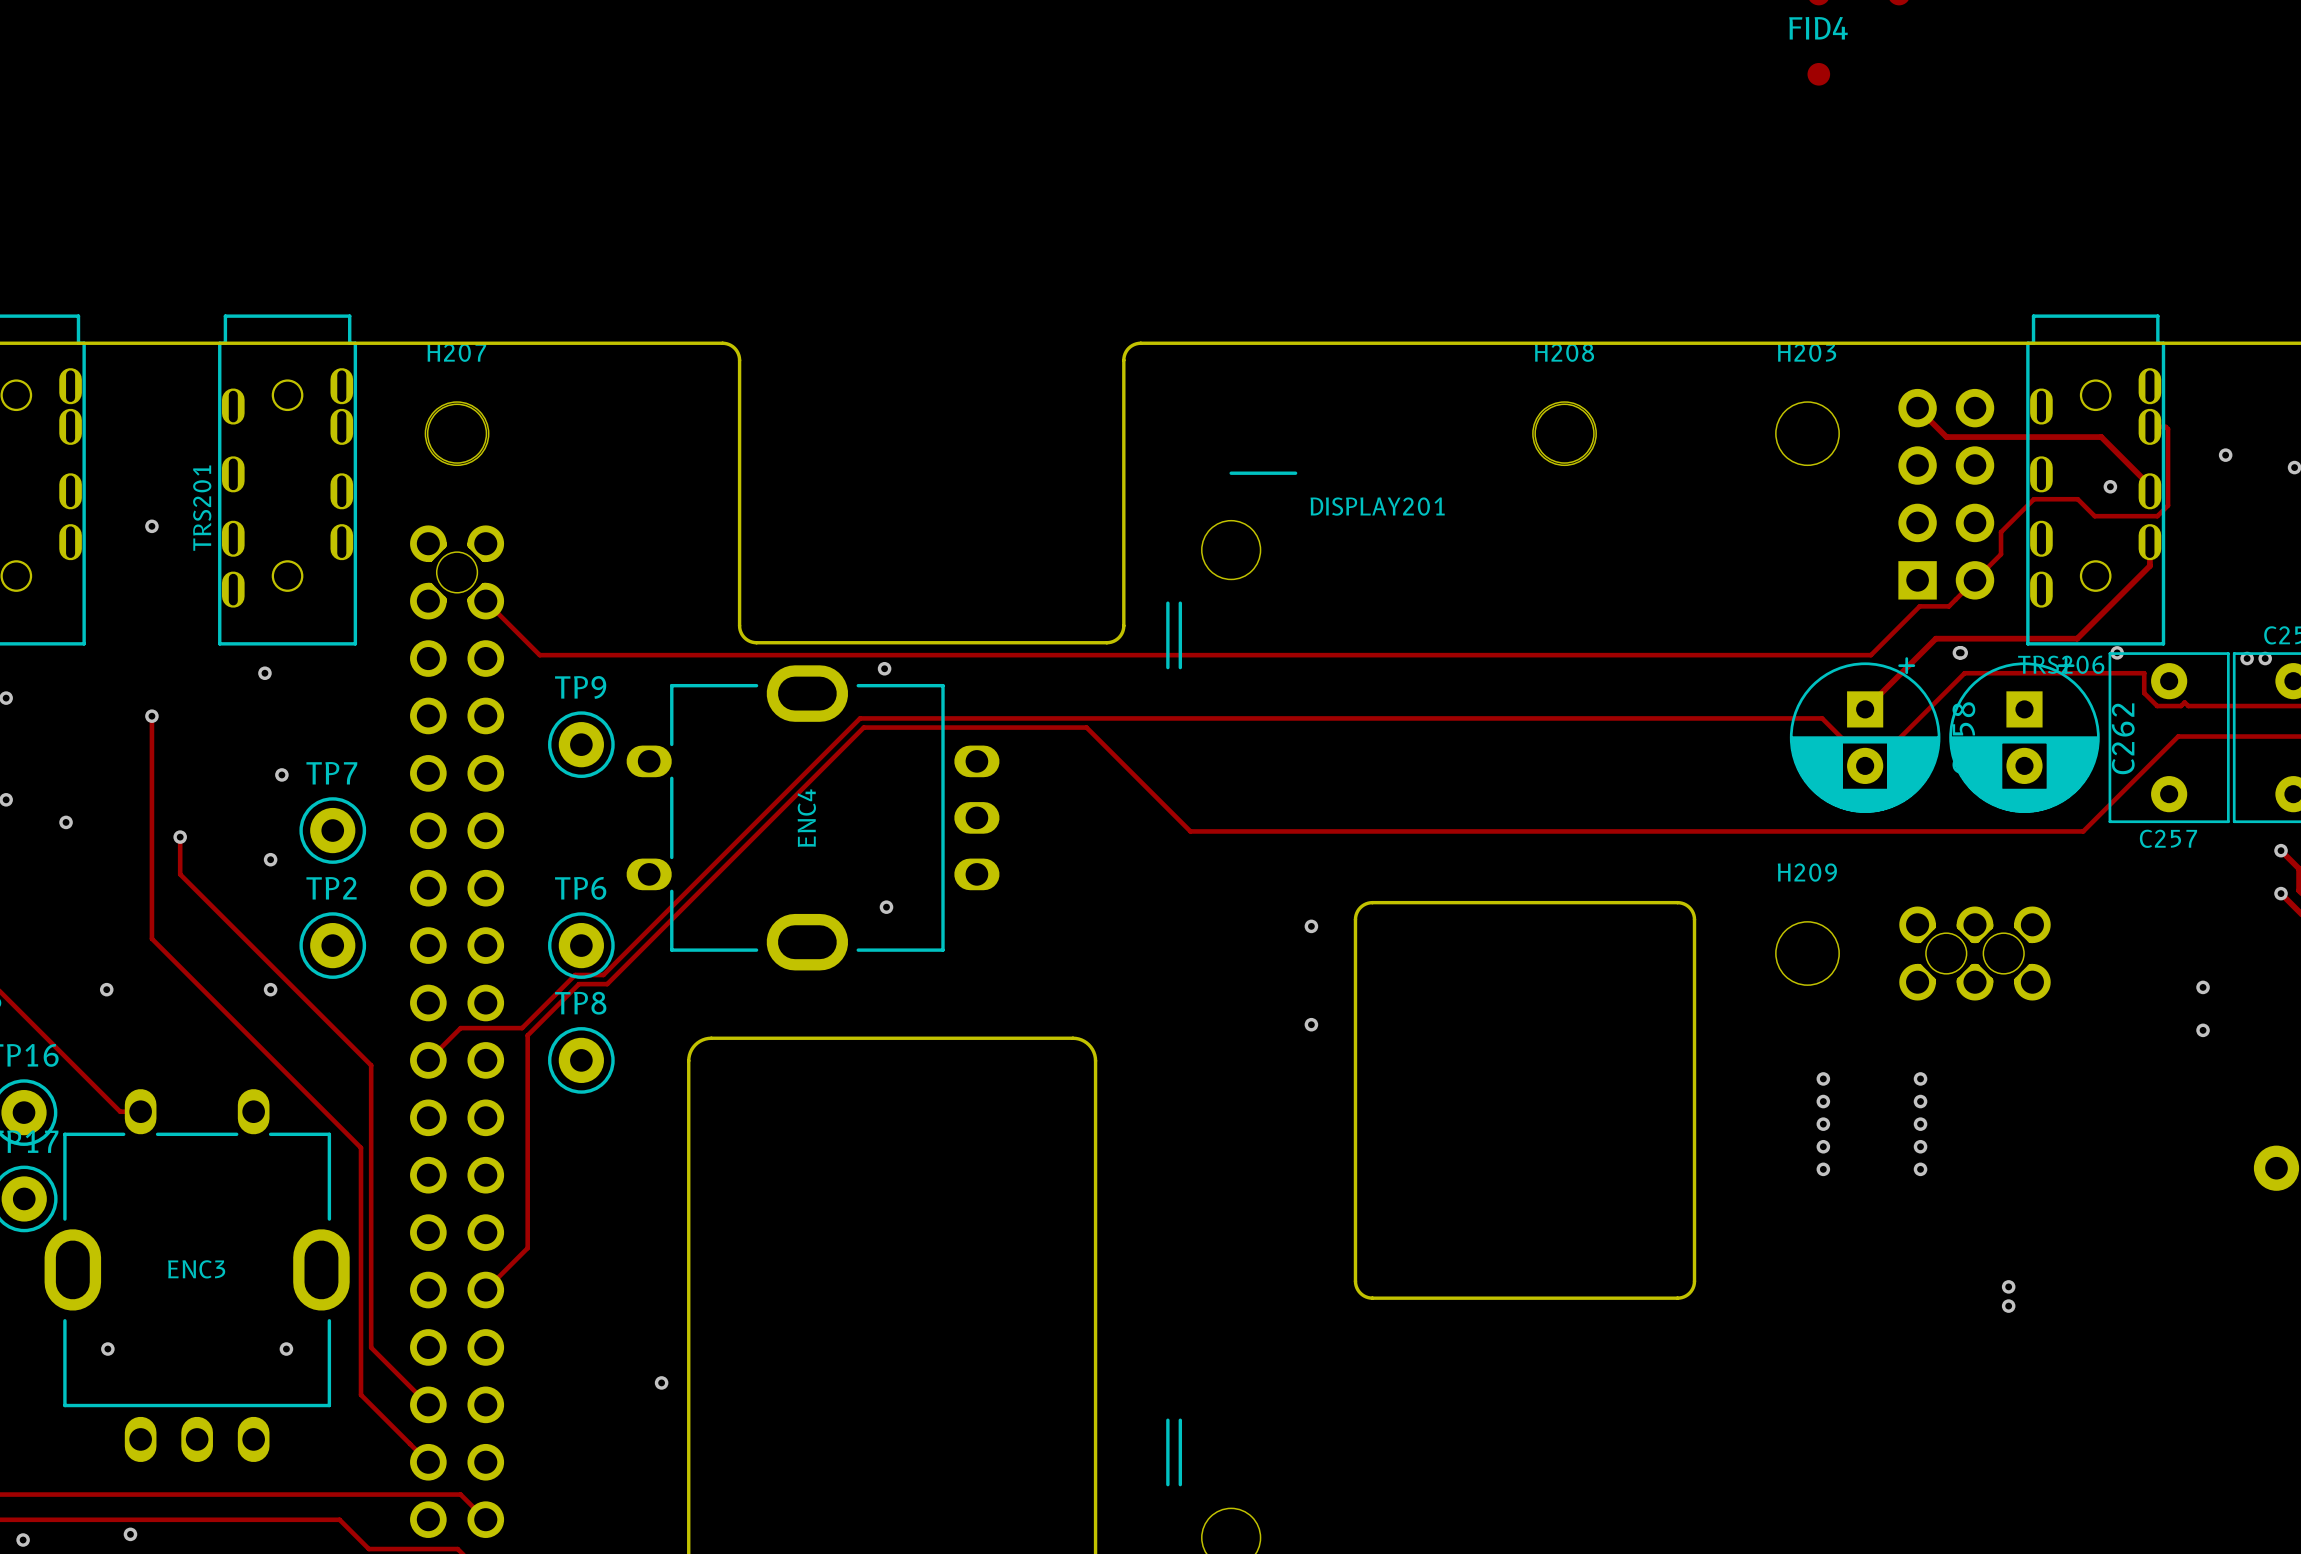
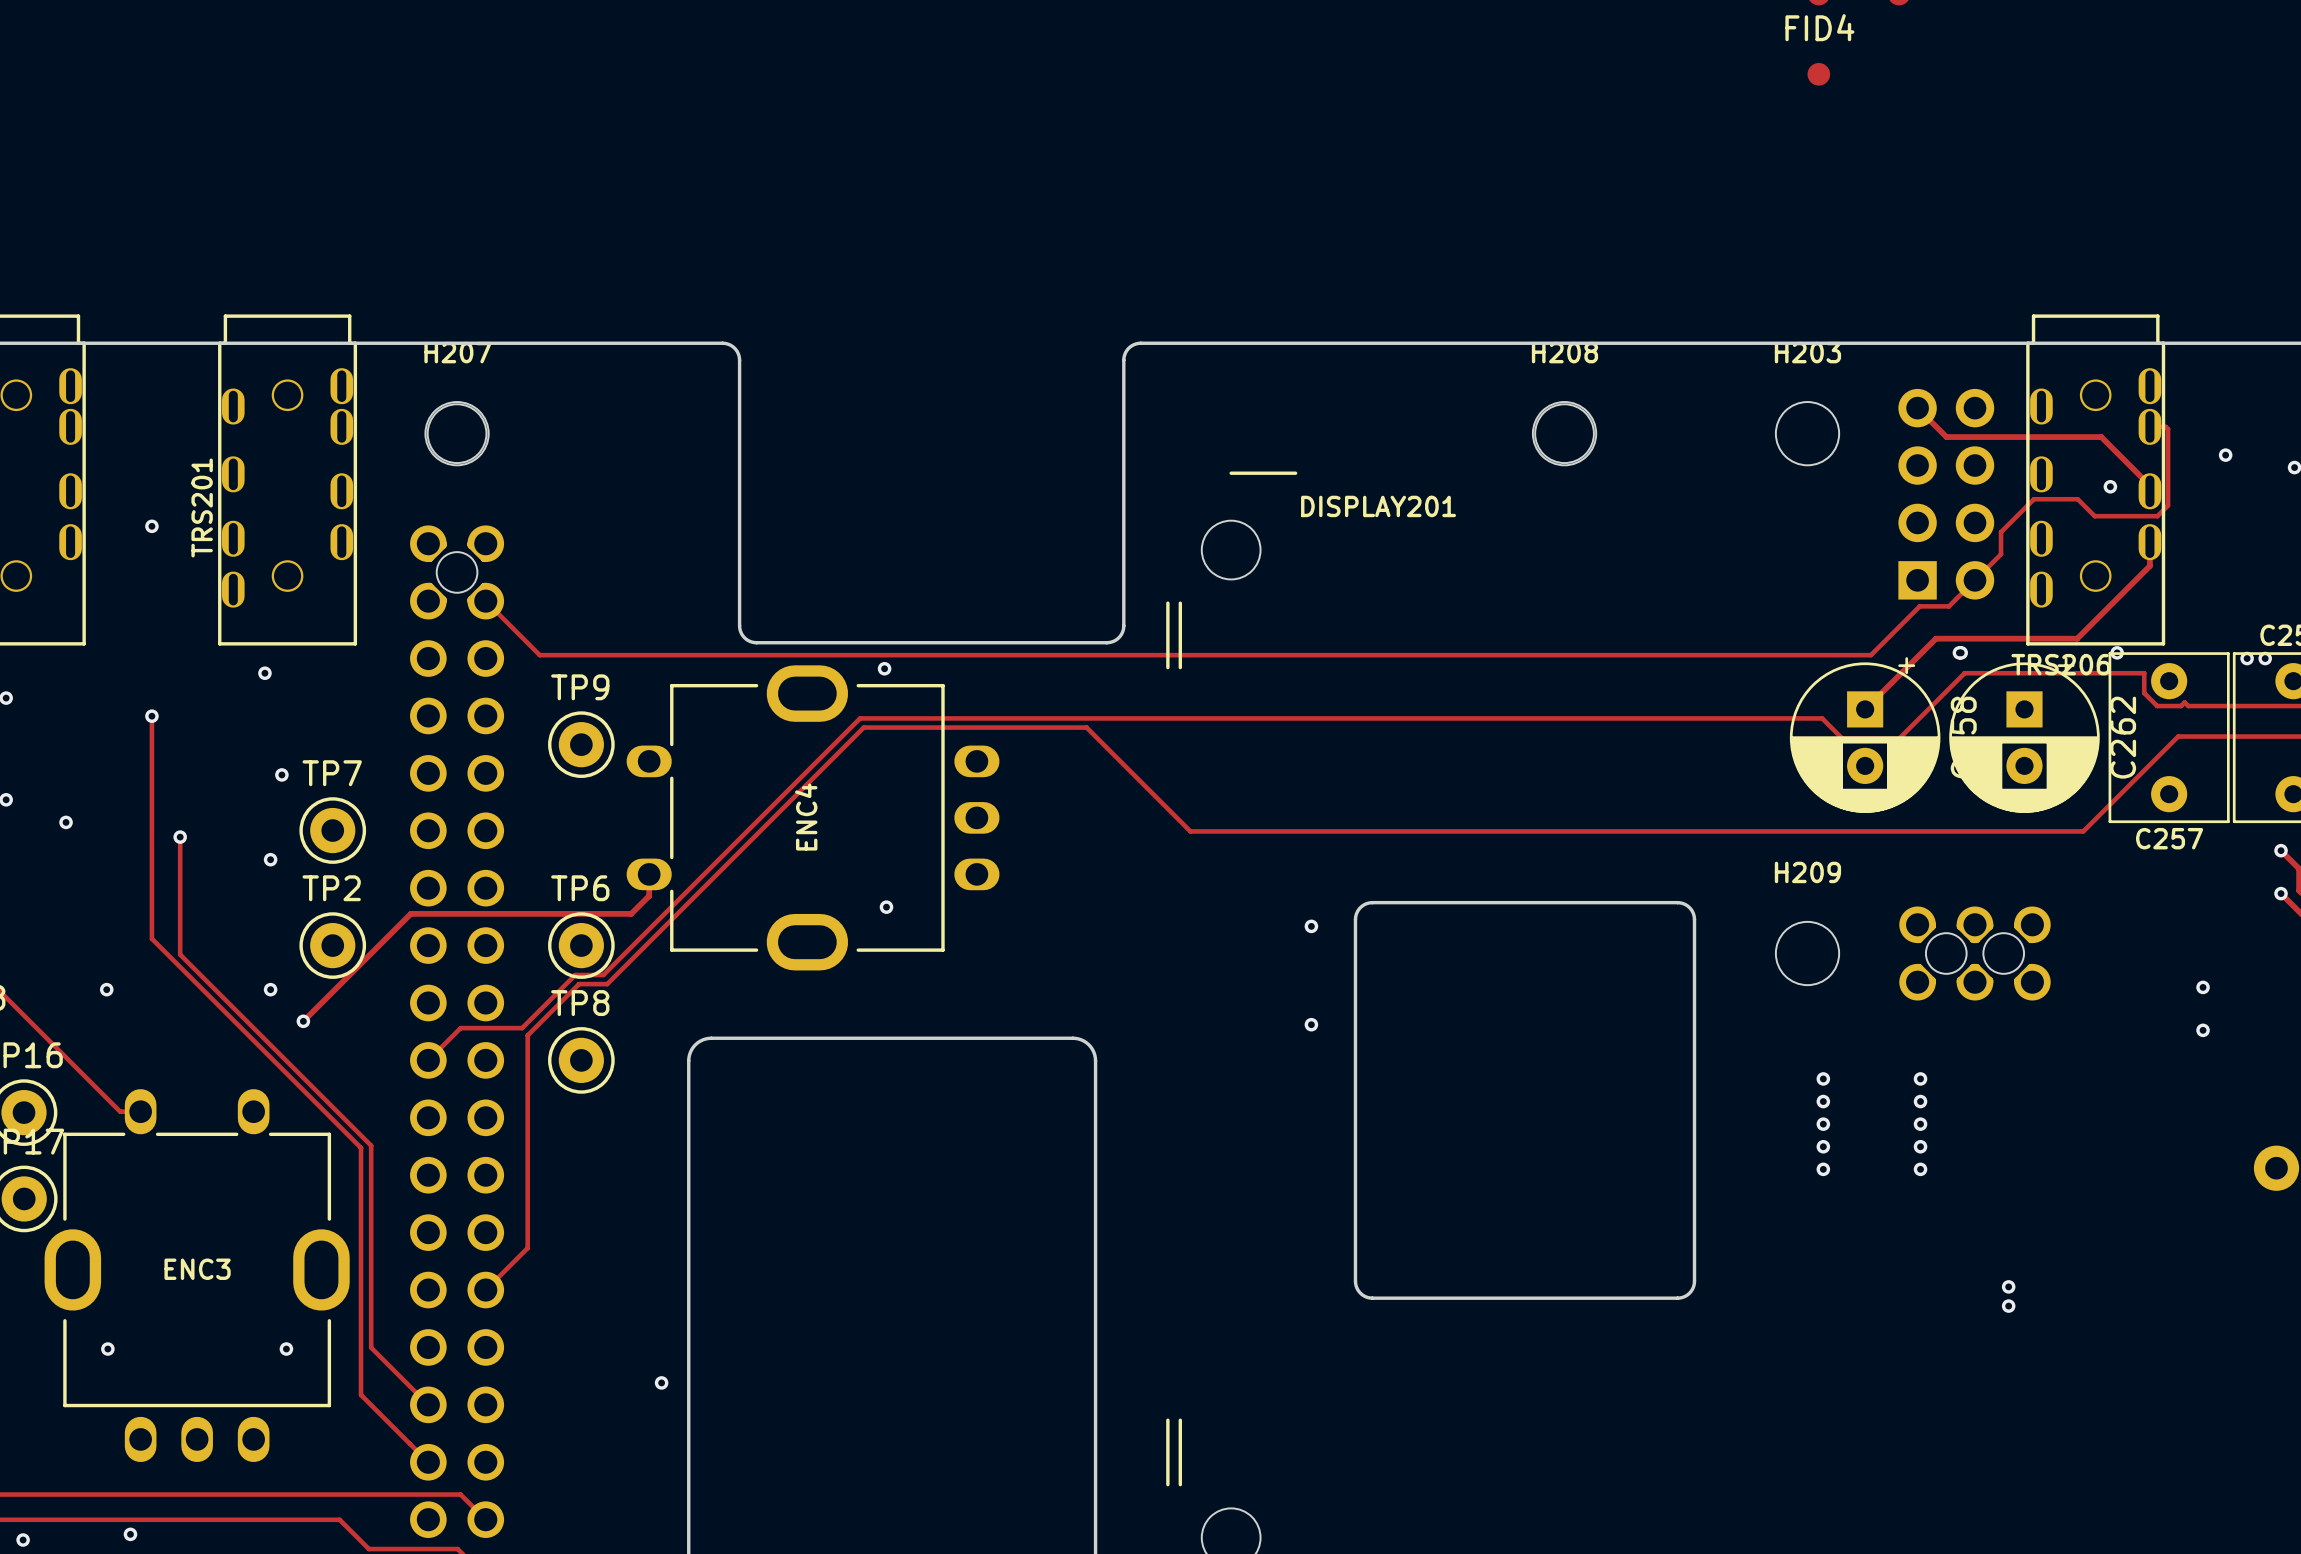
track: (180, 874) (371, 1065) (371, 1145) -> (180, 874) (180, 954) (371, 1145)
track: none -> (649, 874) (649, 895) (631, 913) (410, 913) (303, 1021)
via: none -> (303, 1021)

